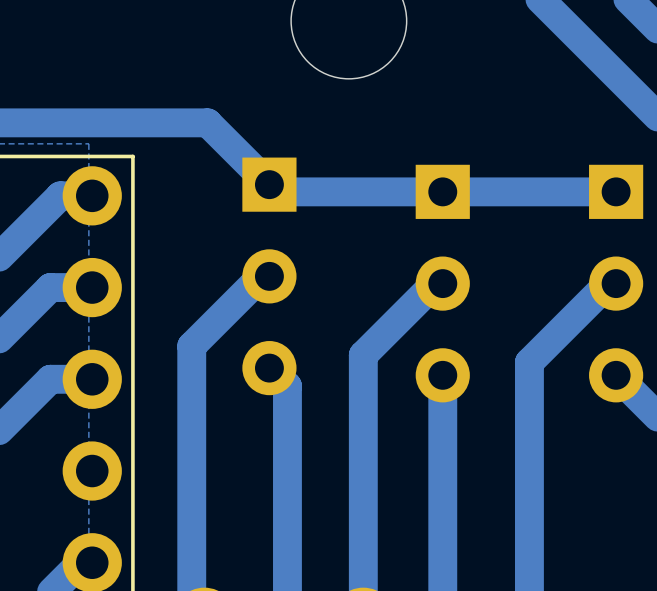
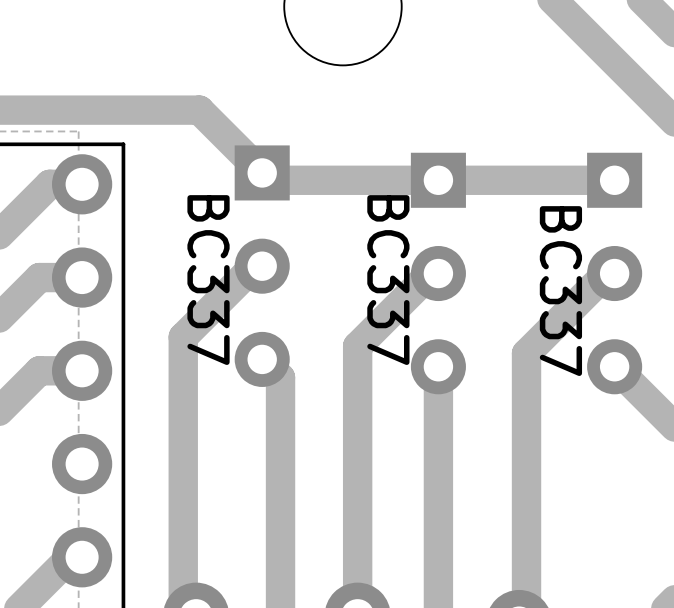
part value: none -> BC337 (208, 280)
part value: none -> BC337 (388, 280)
part value: none -> BC337 (560, 291)

